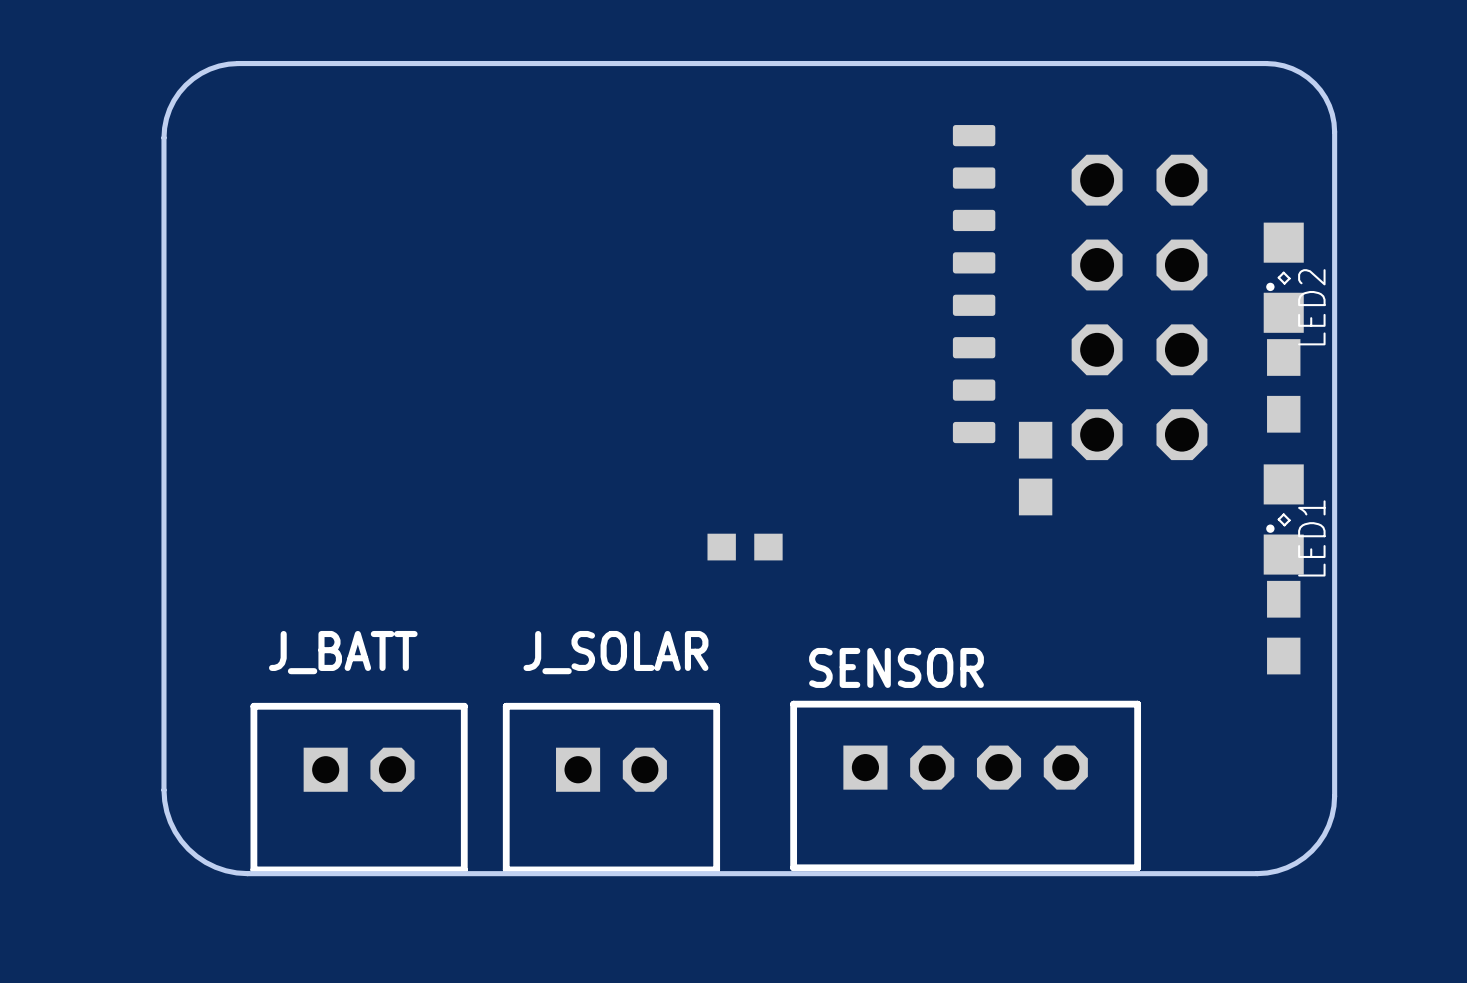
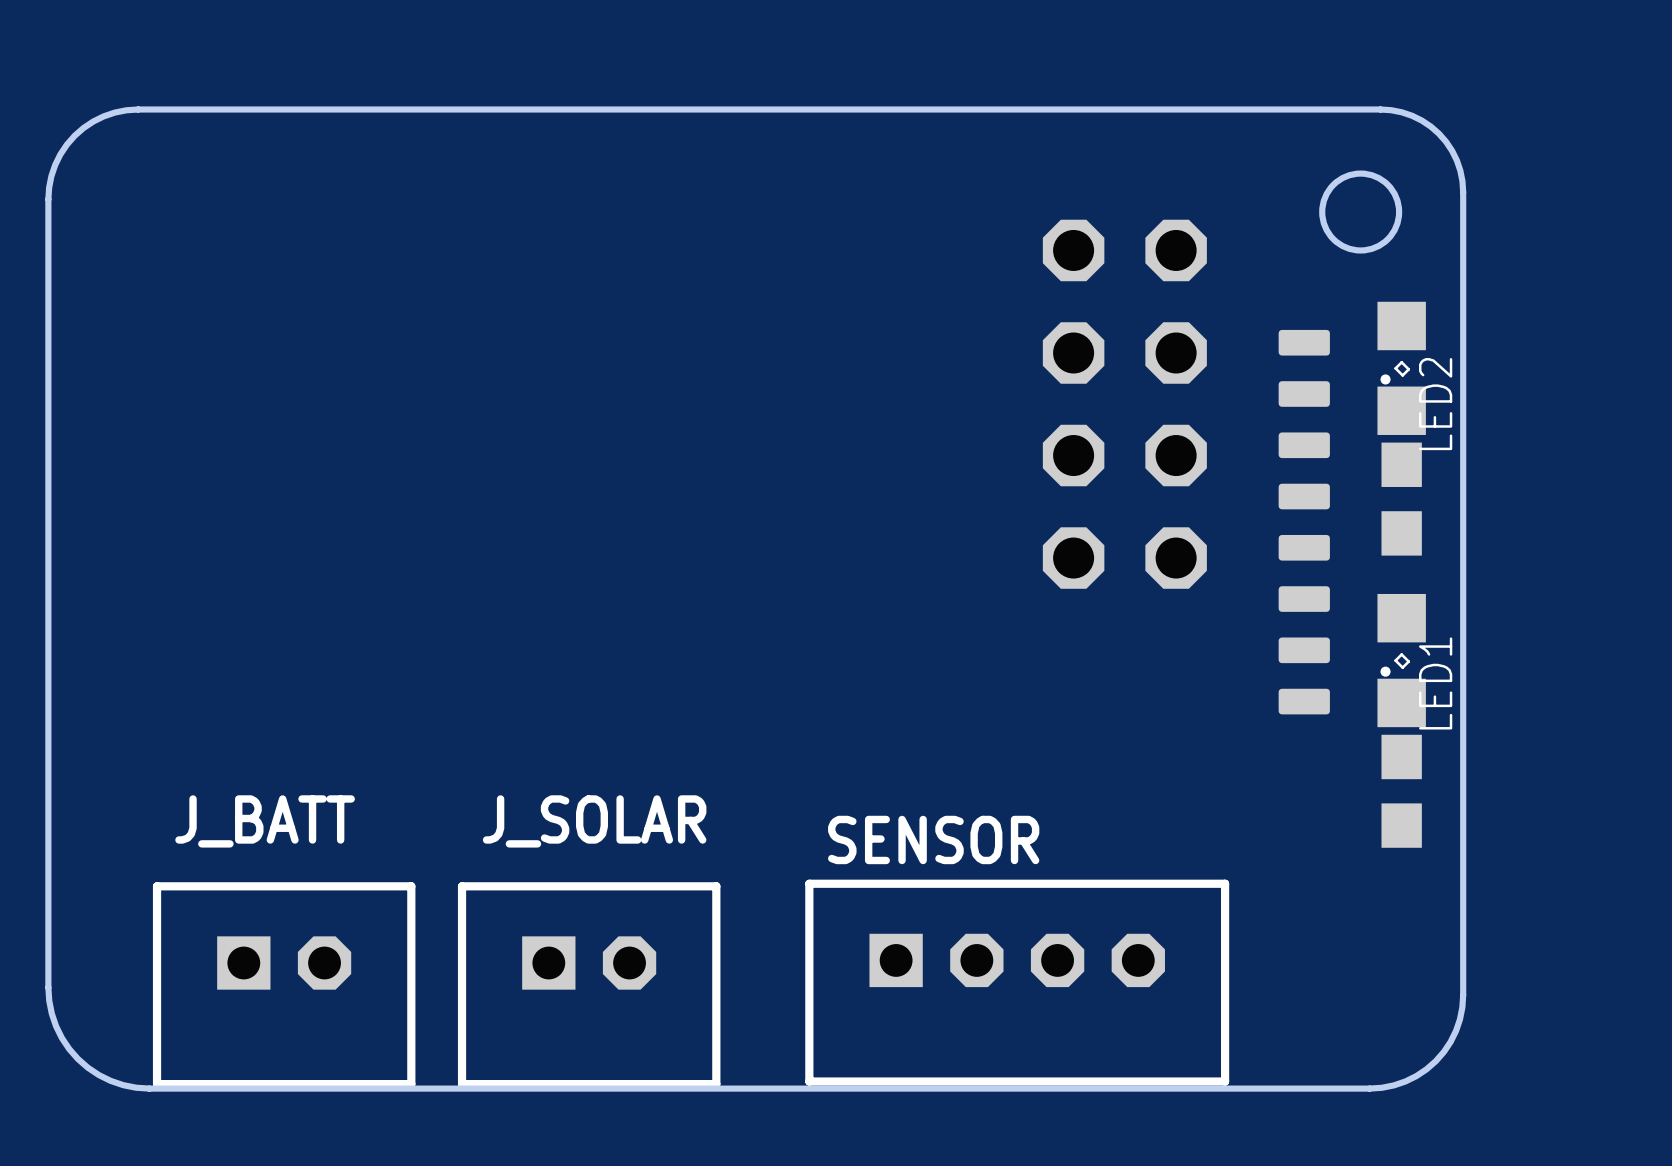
round board edge: none -> [1319, 170, 1403, 254]
part position: (974, 284) -> (1304, 522)
part position: (1139, 307) -> (1124, 404)
part: (1035, 468) -> none
part: (745, 547) -> none

